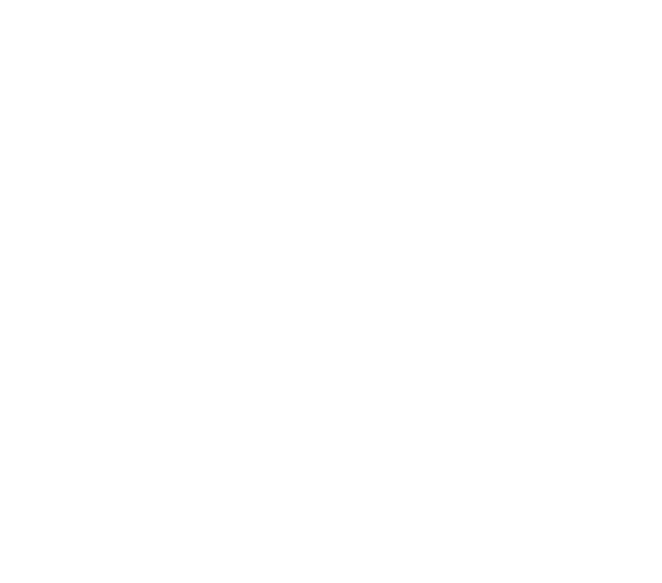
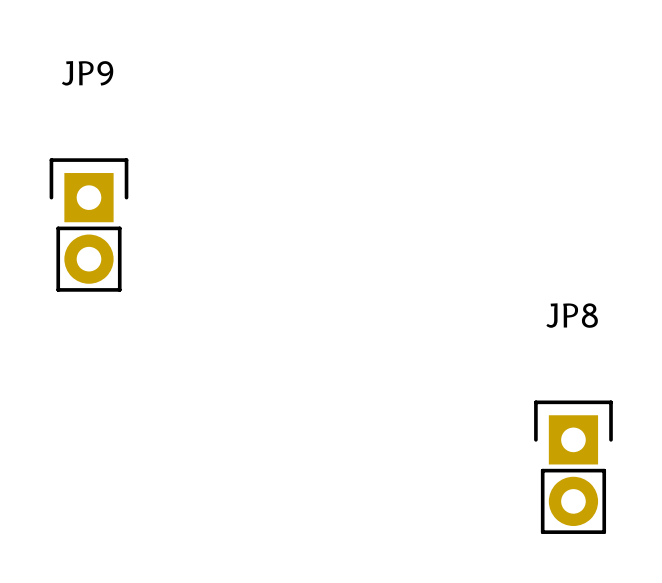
JP9: none -> (88, 225)
JP8: none -> (573, 467)

